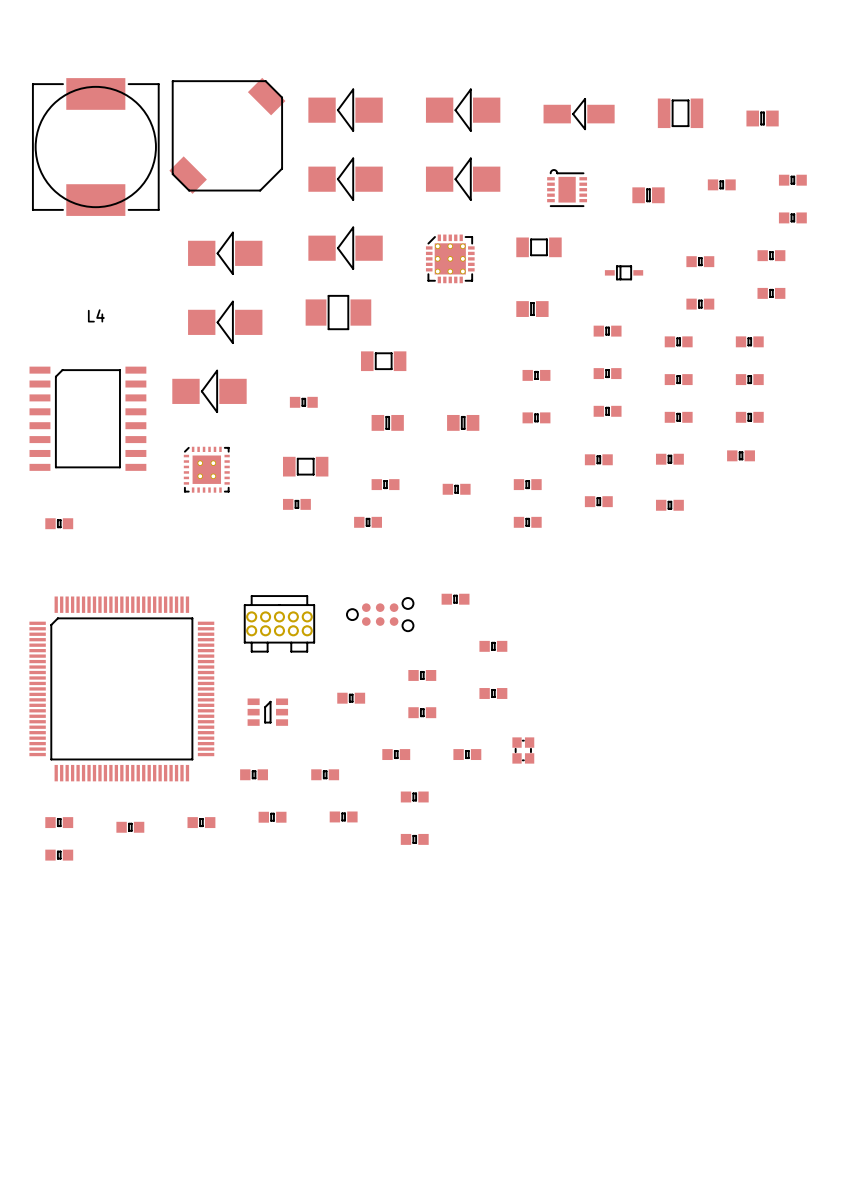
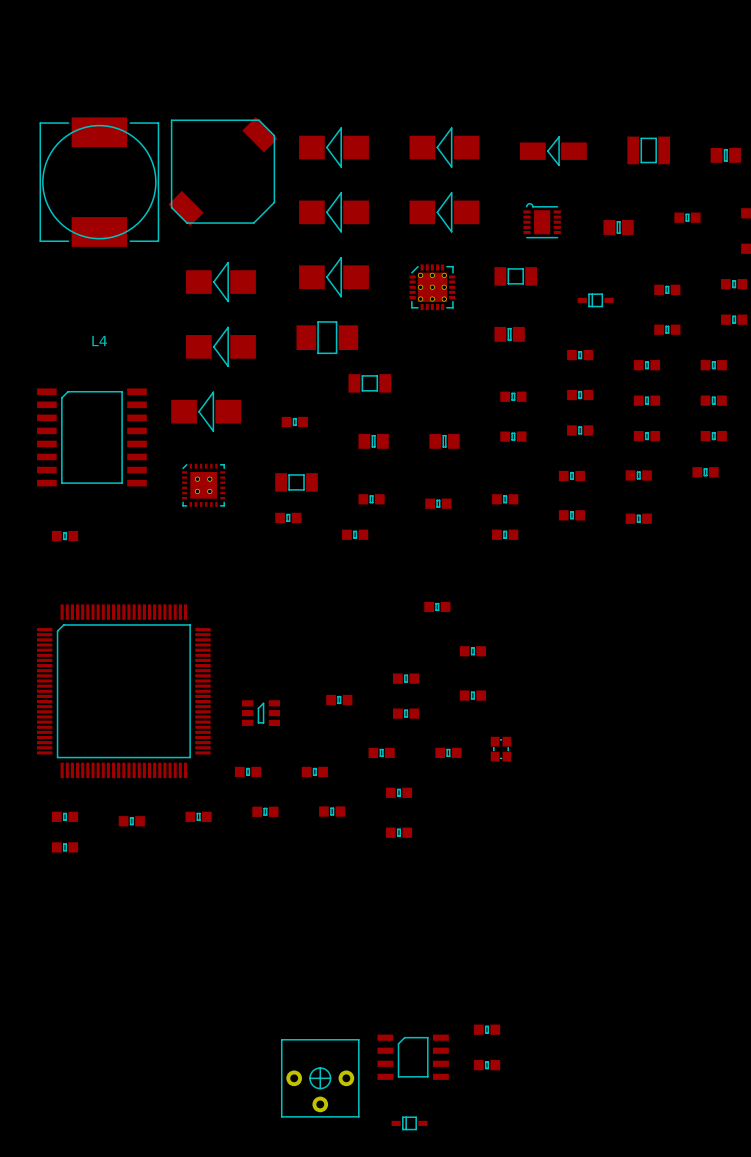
part: (380, 614) -> none
part: (279, 623) -> none
part: none -> (487, 1029)
part: none -> (413, 1057)
part: none -> (487, 1065)
part: none -> (320, 1078)
part: none -> (409, 1123)

